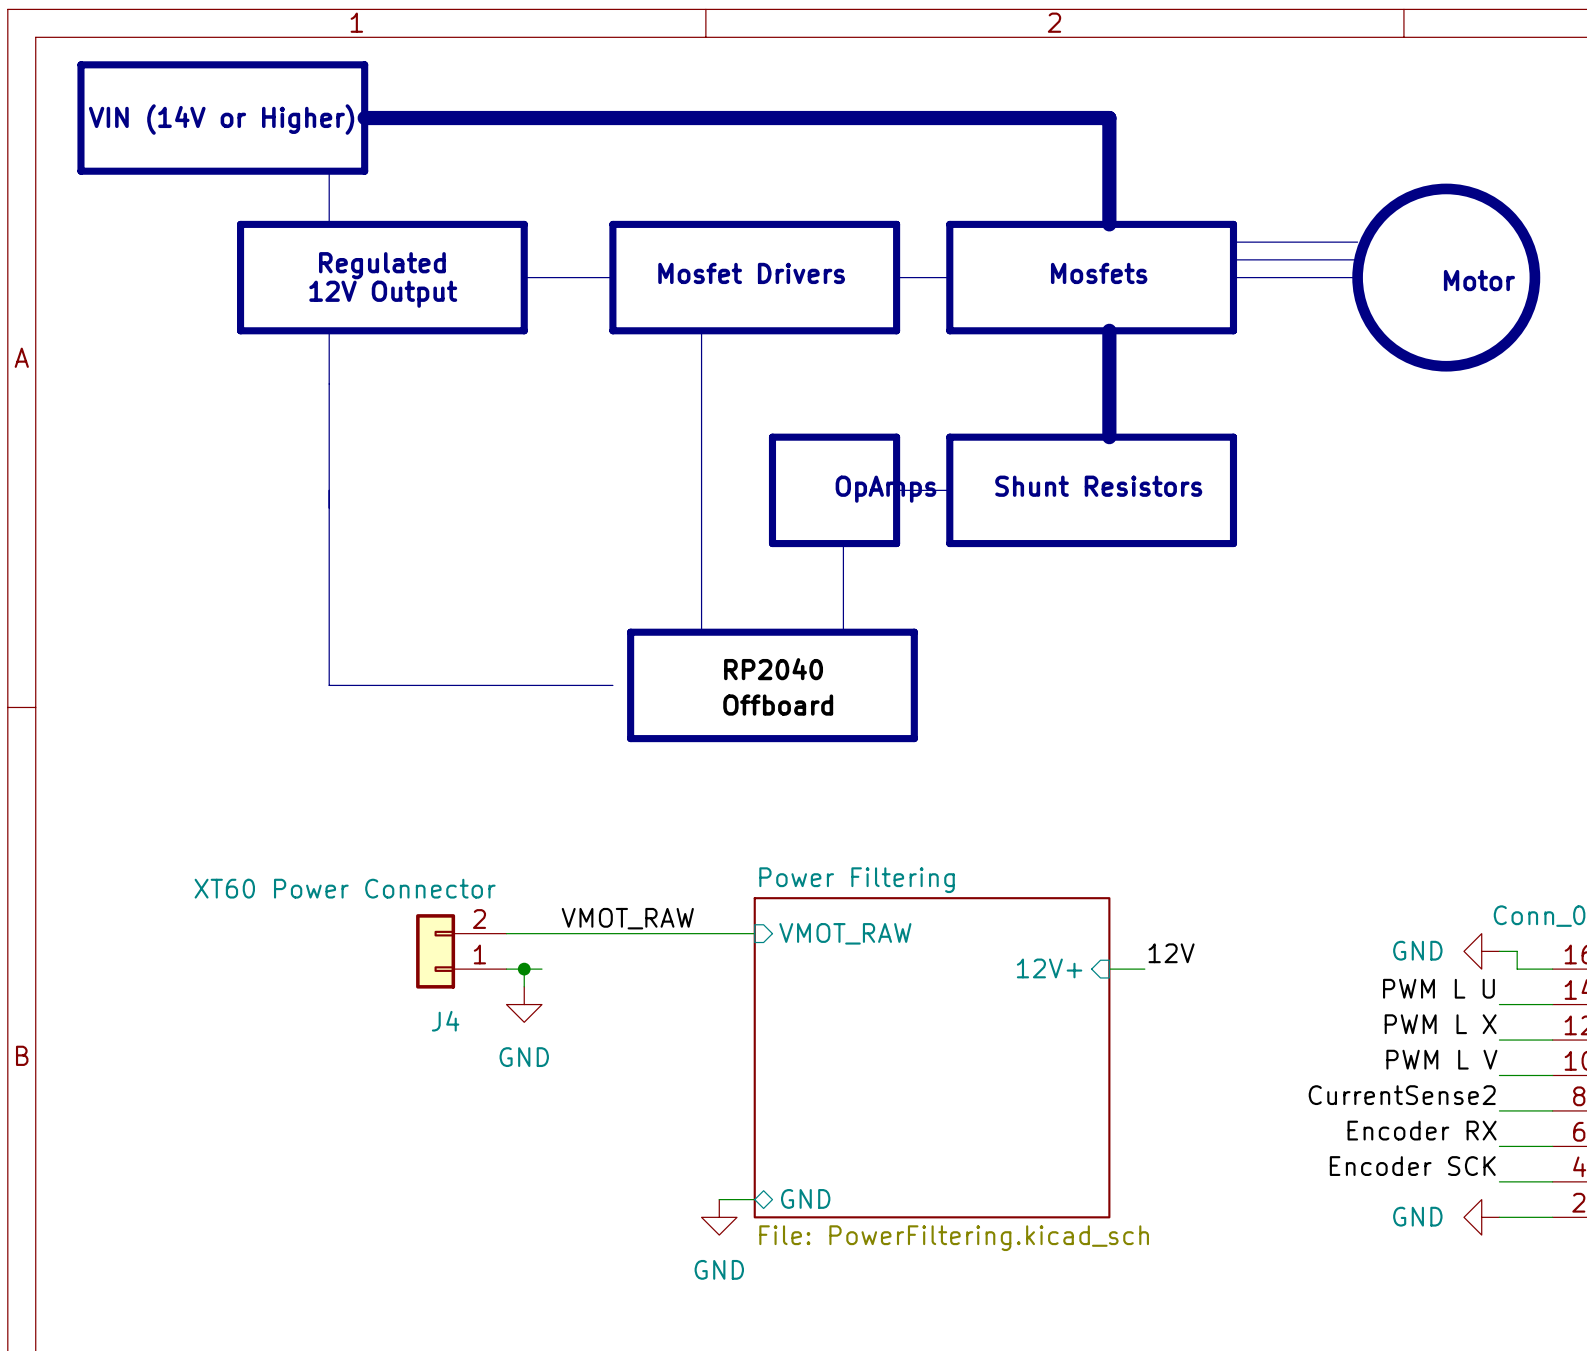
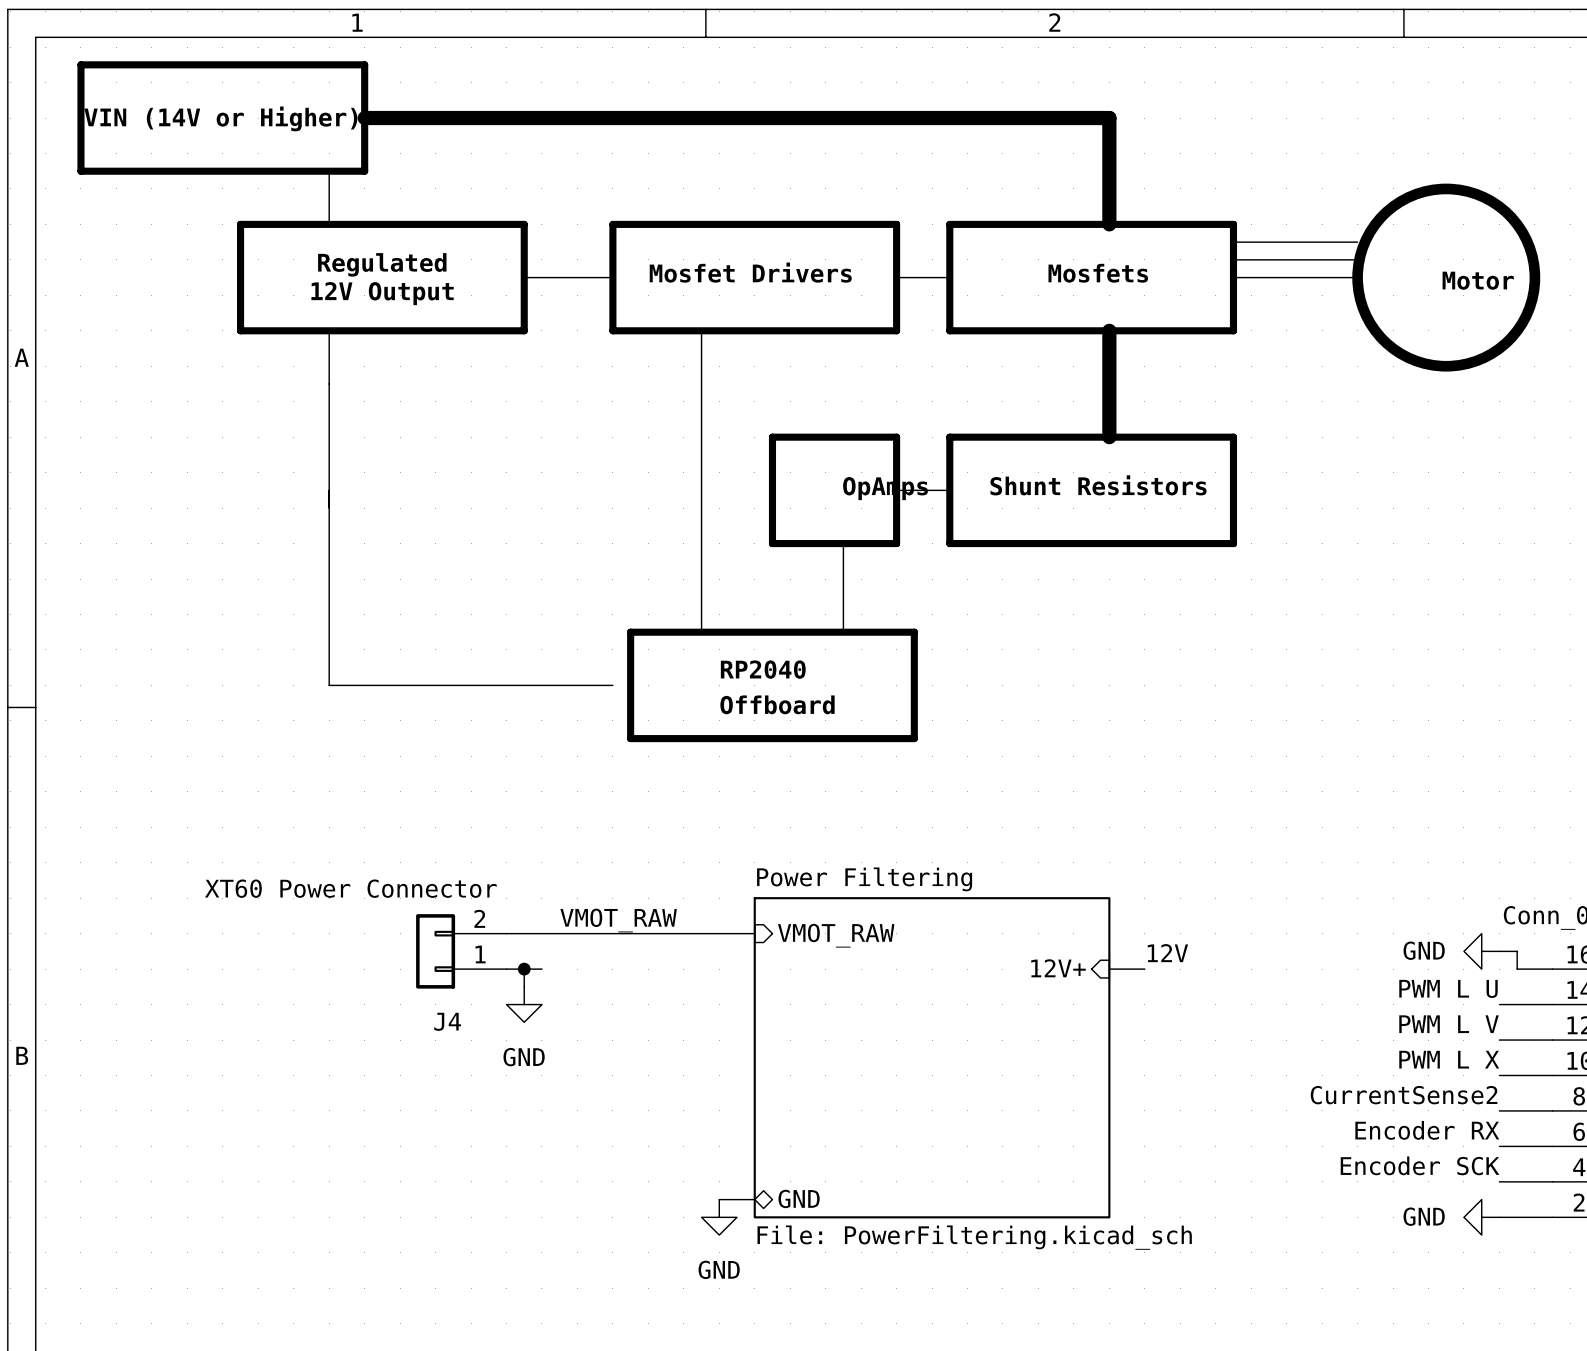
label: PWM L X (1440, 1024) -> PWM L V (1449, 1024)
label: PWM L V (1441, 1059) -> PWM L X (1449, 1059)

